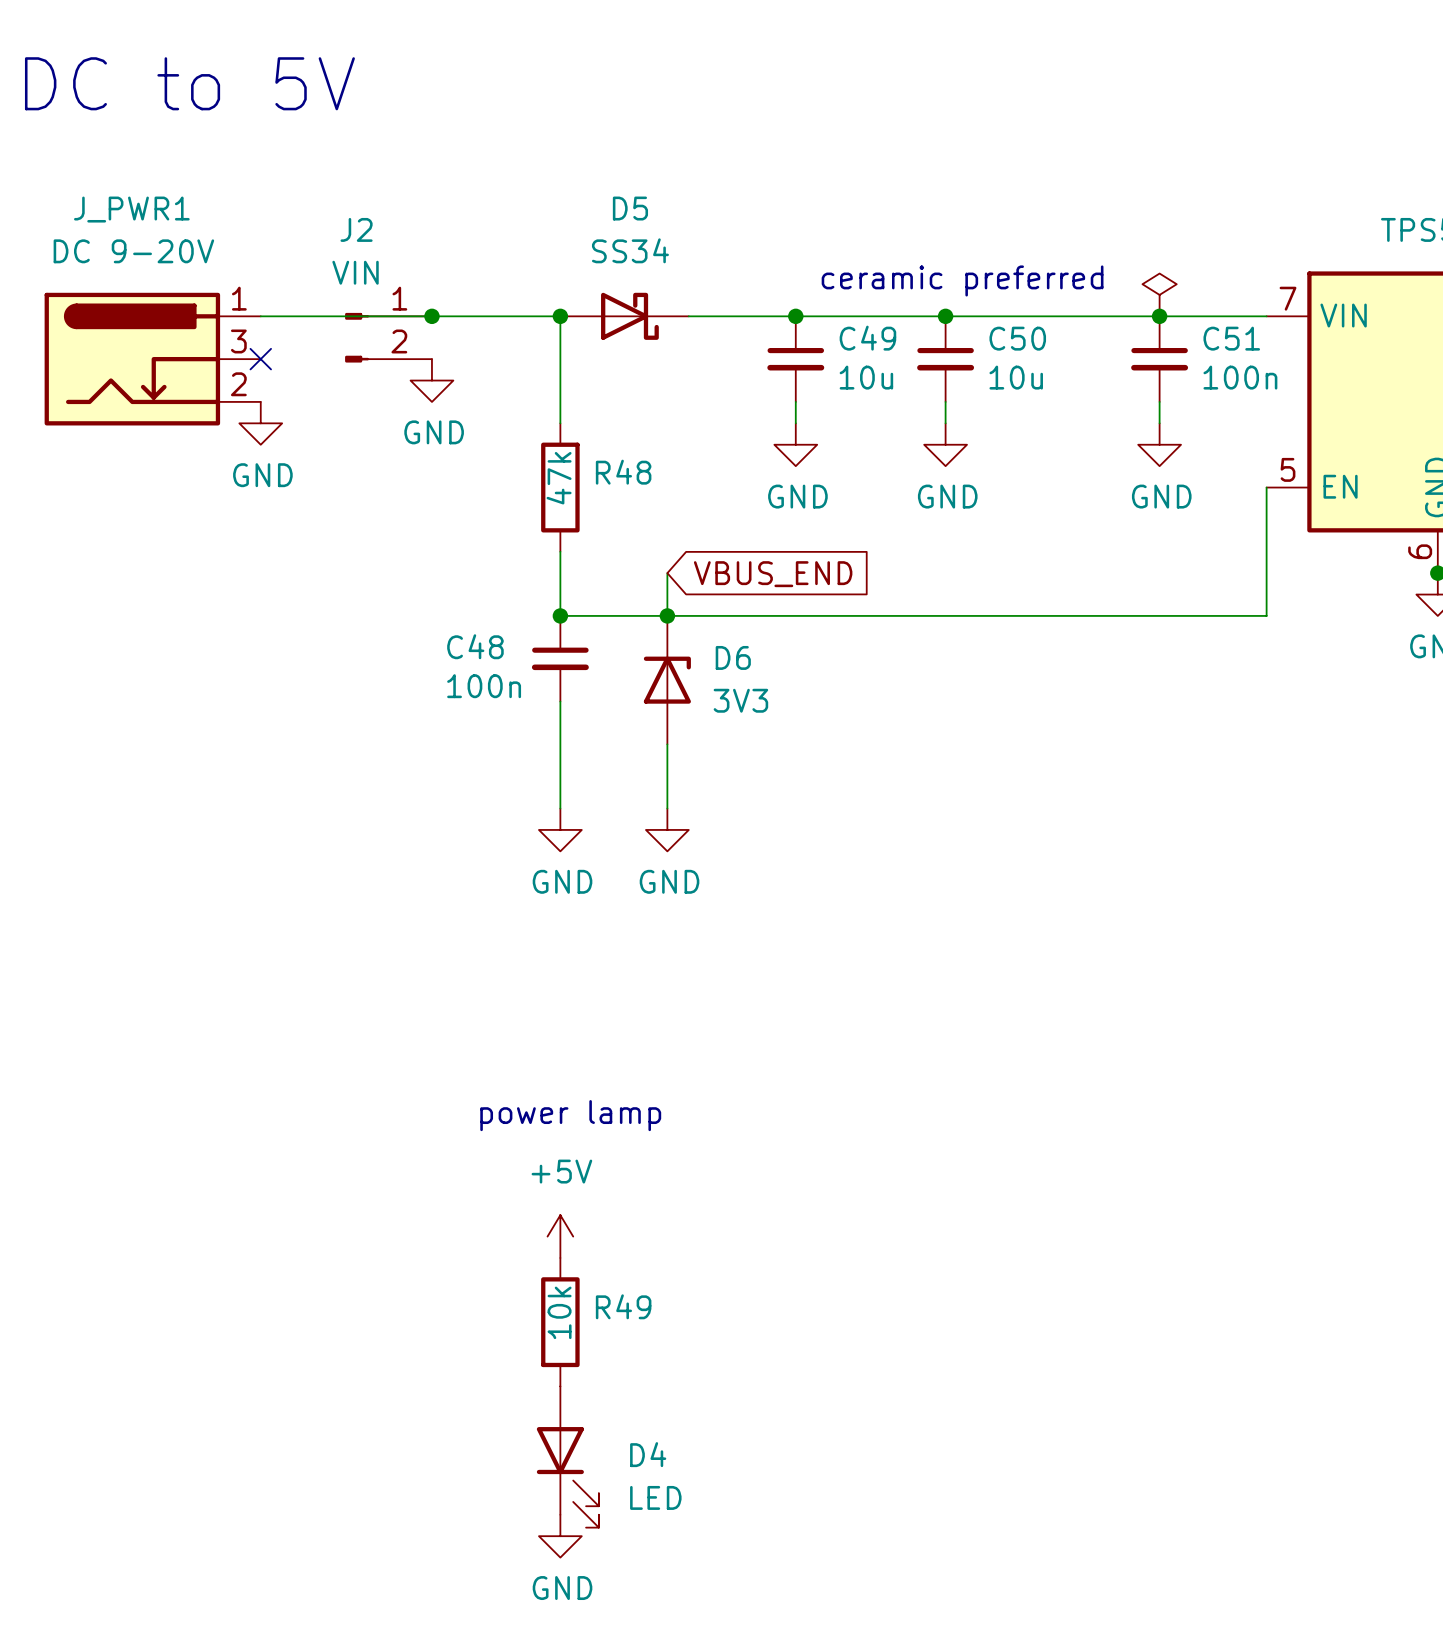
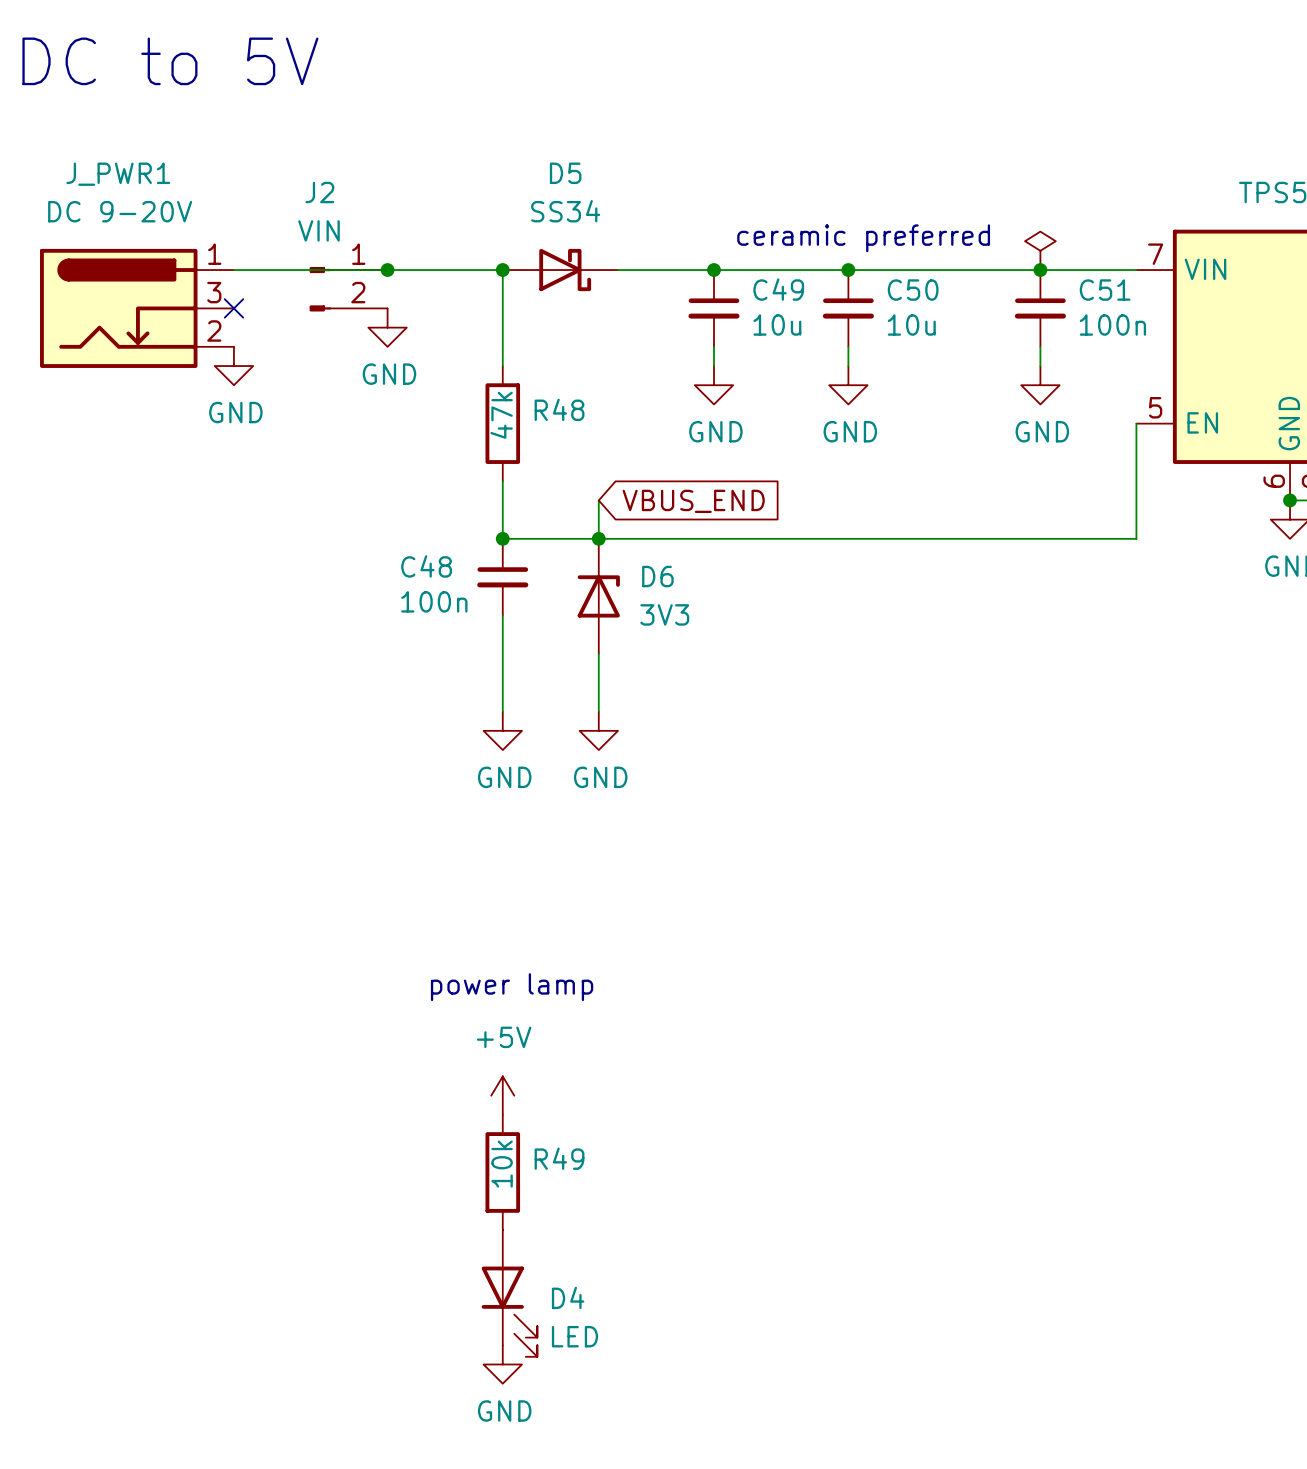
D4 name position: D4 (648, 1454) -> D4 (568, 1297)
D4 value position: LED (655, 1497) -> LED (574, 1336)

